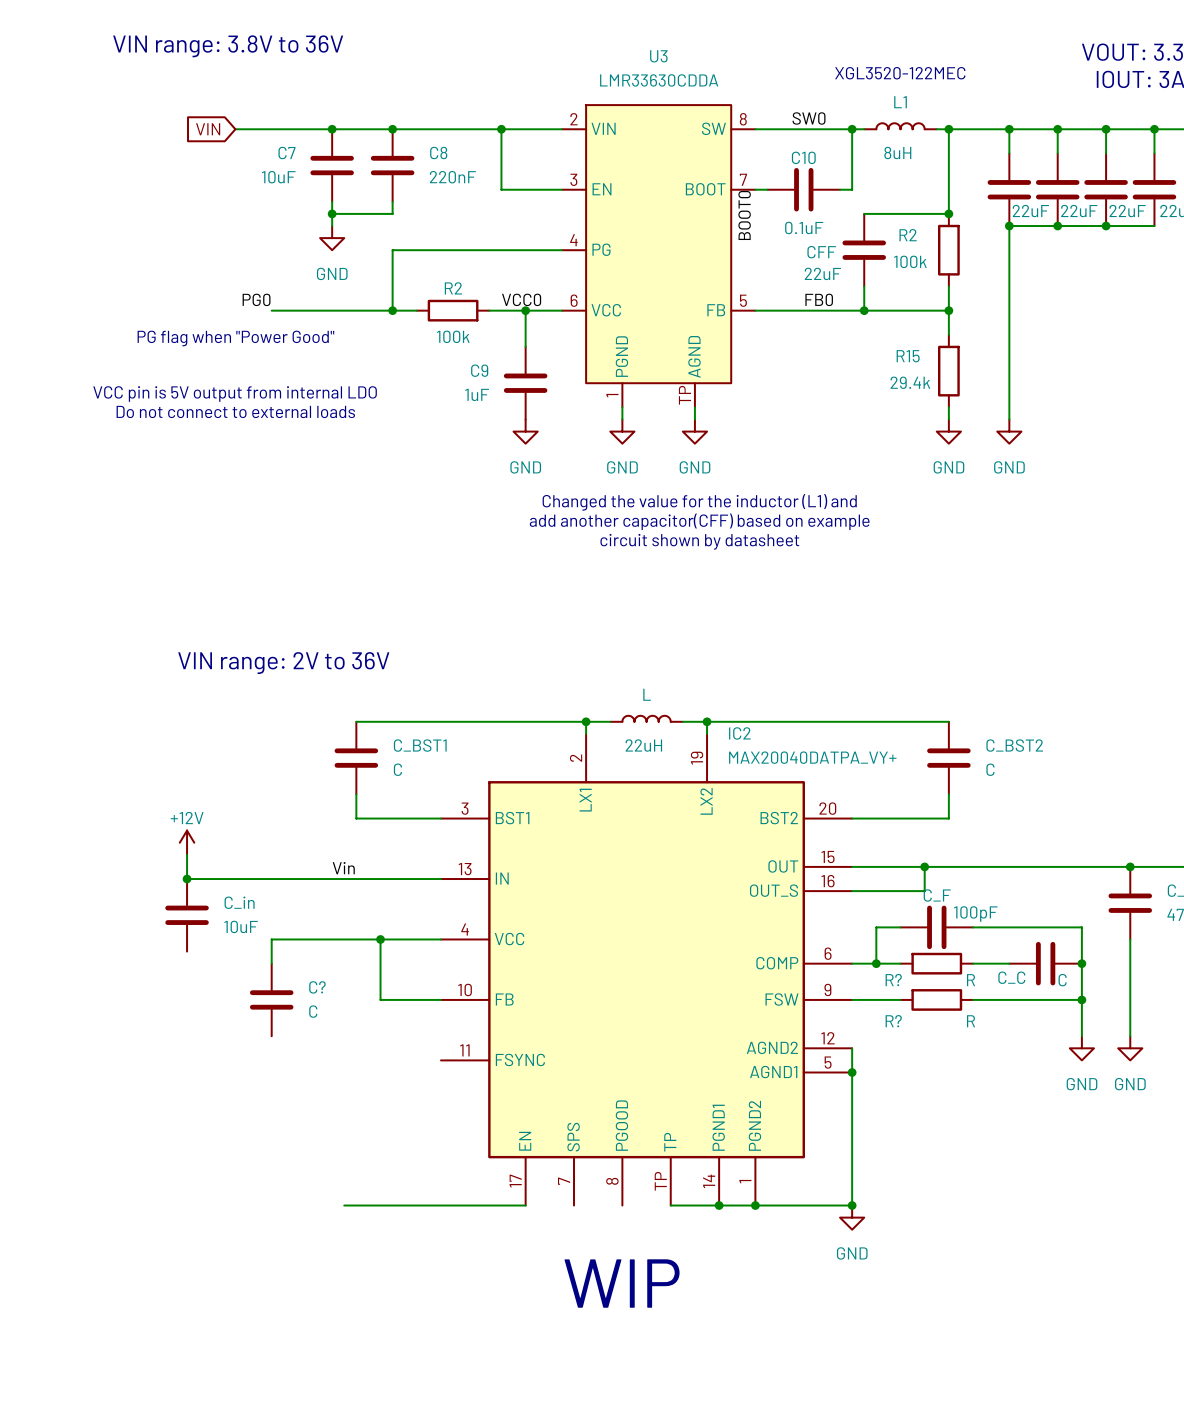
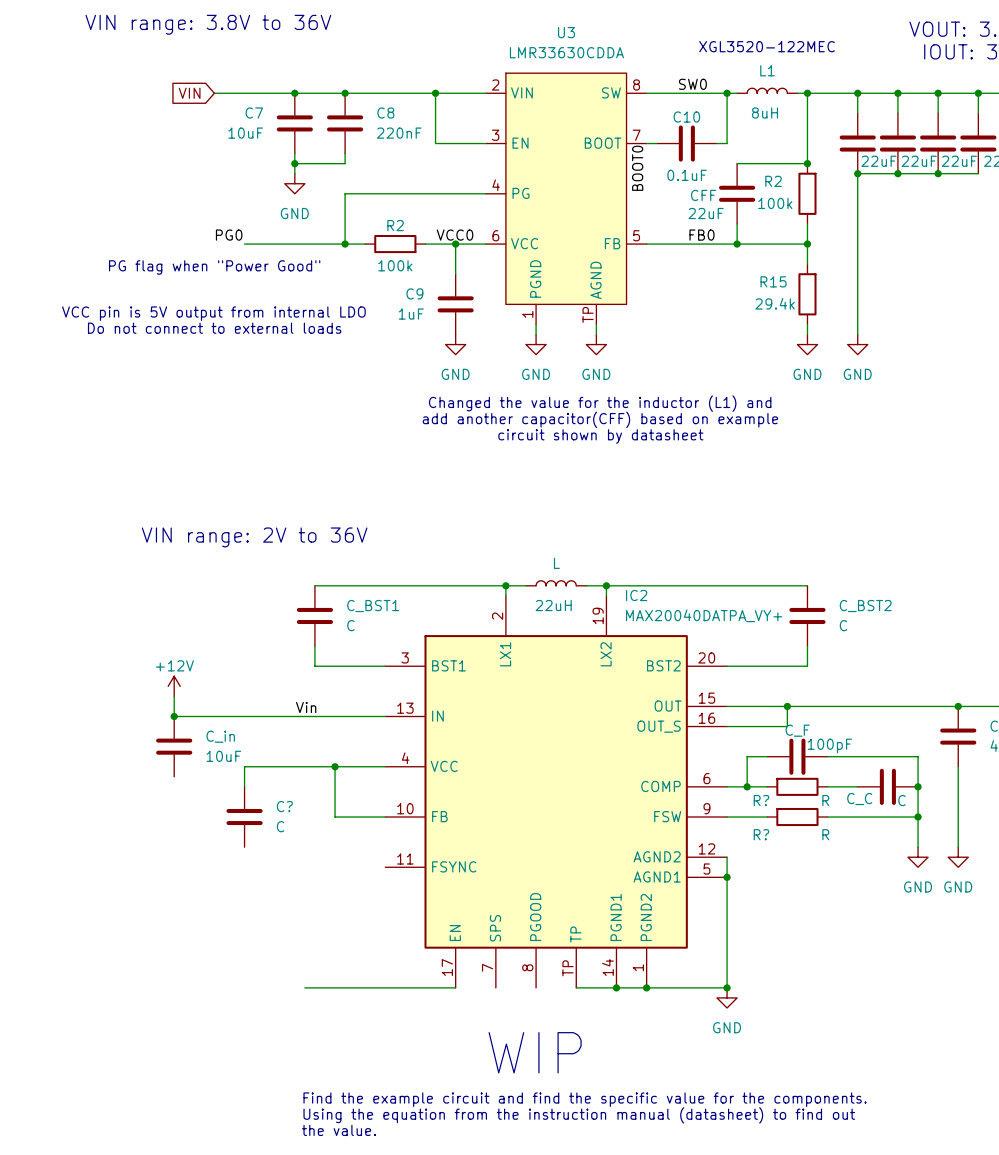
text: none -> Find the example circuit and find the specific value for the components. (585, 1099)
text: none -> Using the equation from the instruction manual (datasheet) to find out (579, 1115)
text: none -> the value. (338, 1130)

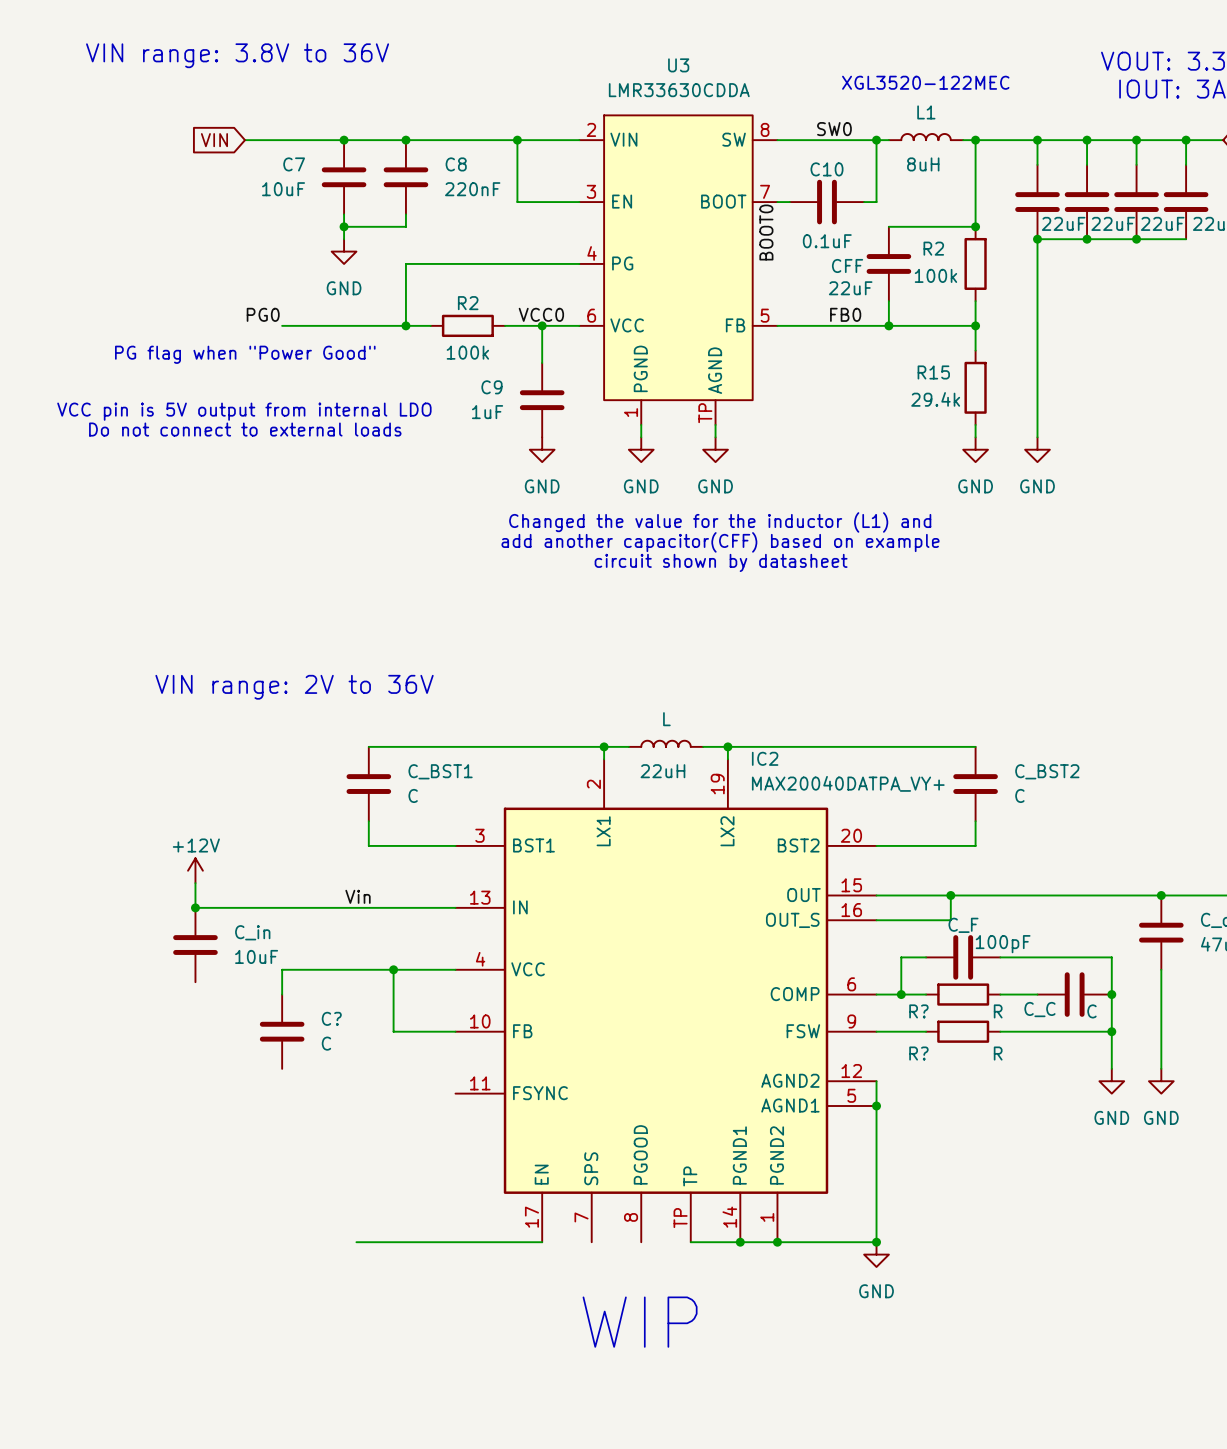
text: Find the example circuit and find the specific value for the components. (585, 1099) -> none
text: Using the equation from the instruction manual (datasheet) to find out (579, 1115) -> none
text: the value. (338, 1130) -> none

